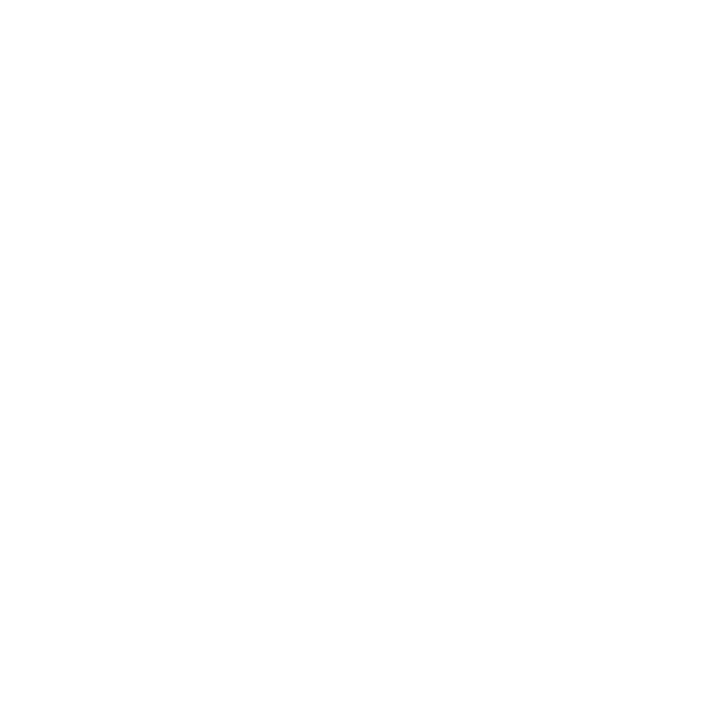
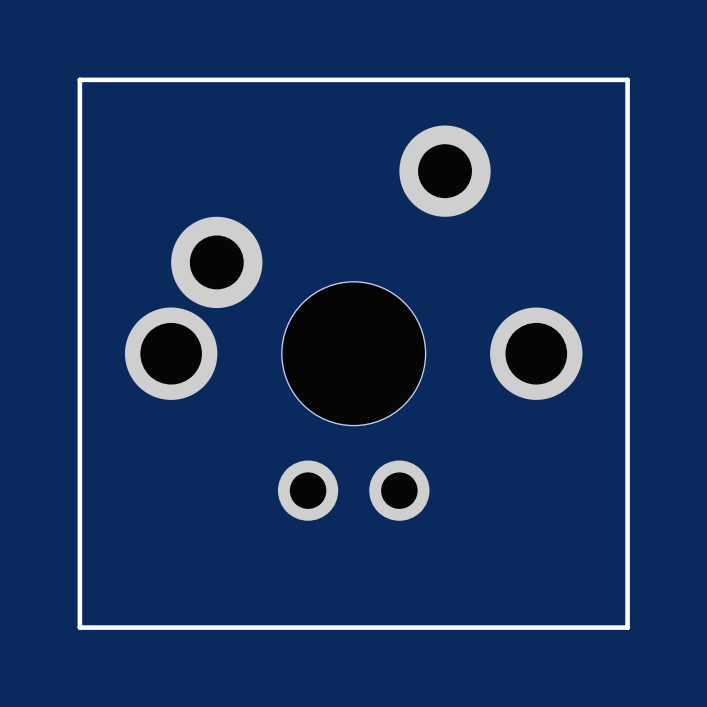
part: none -> (353, 353)

